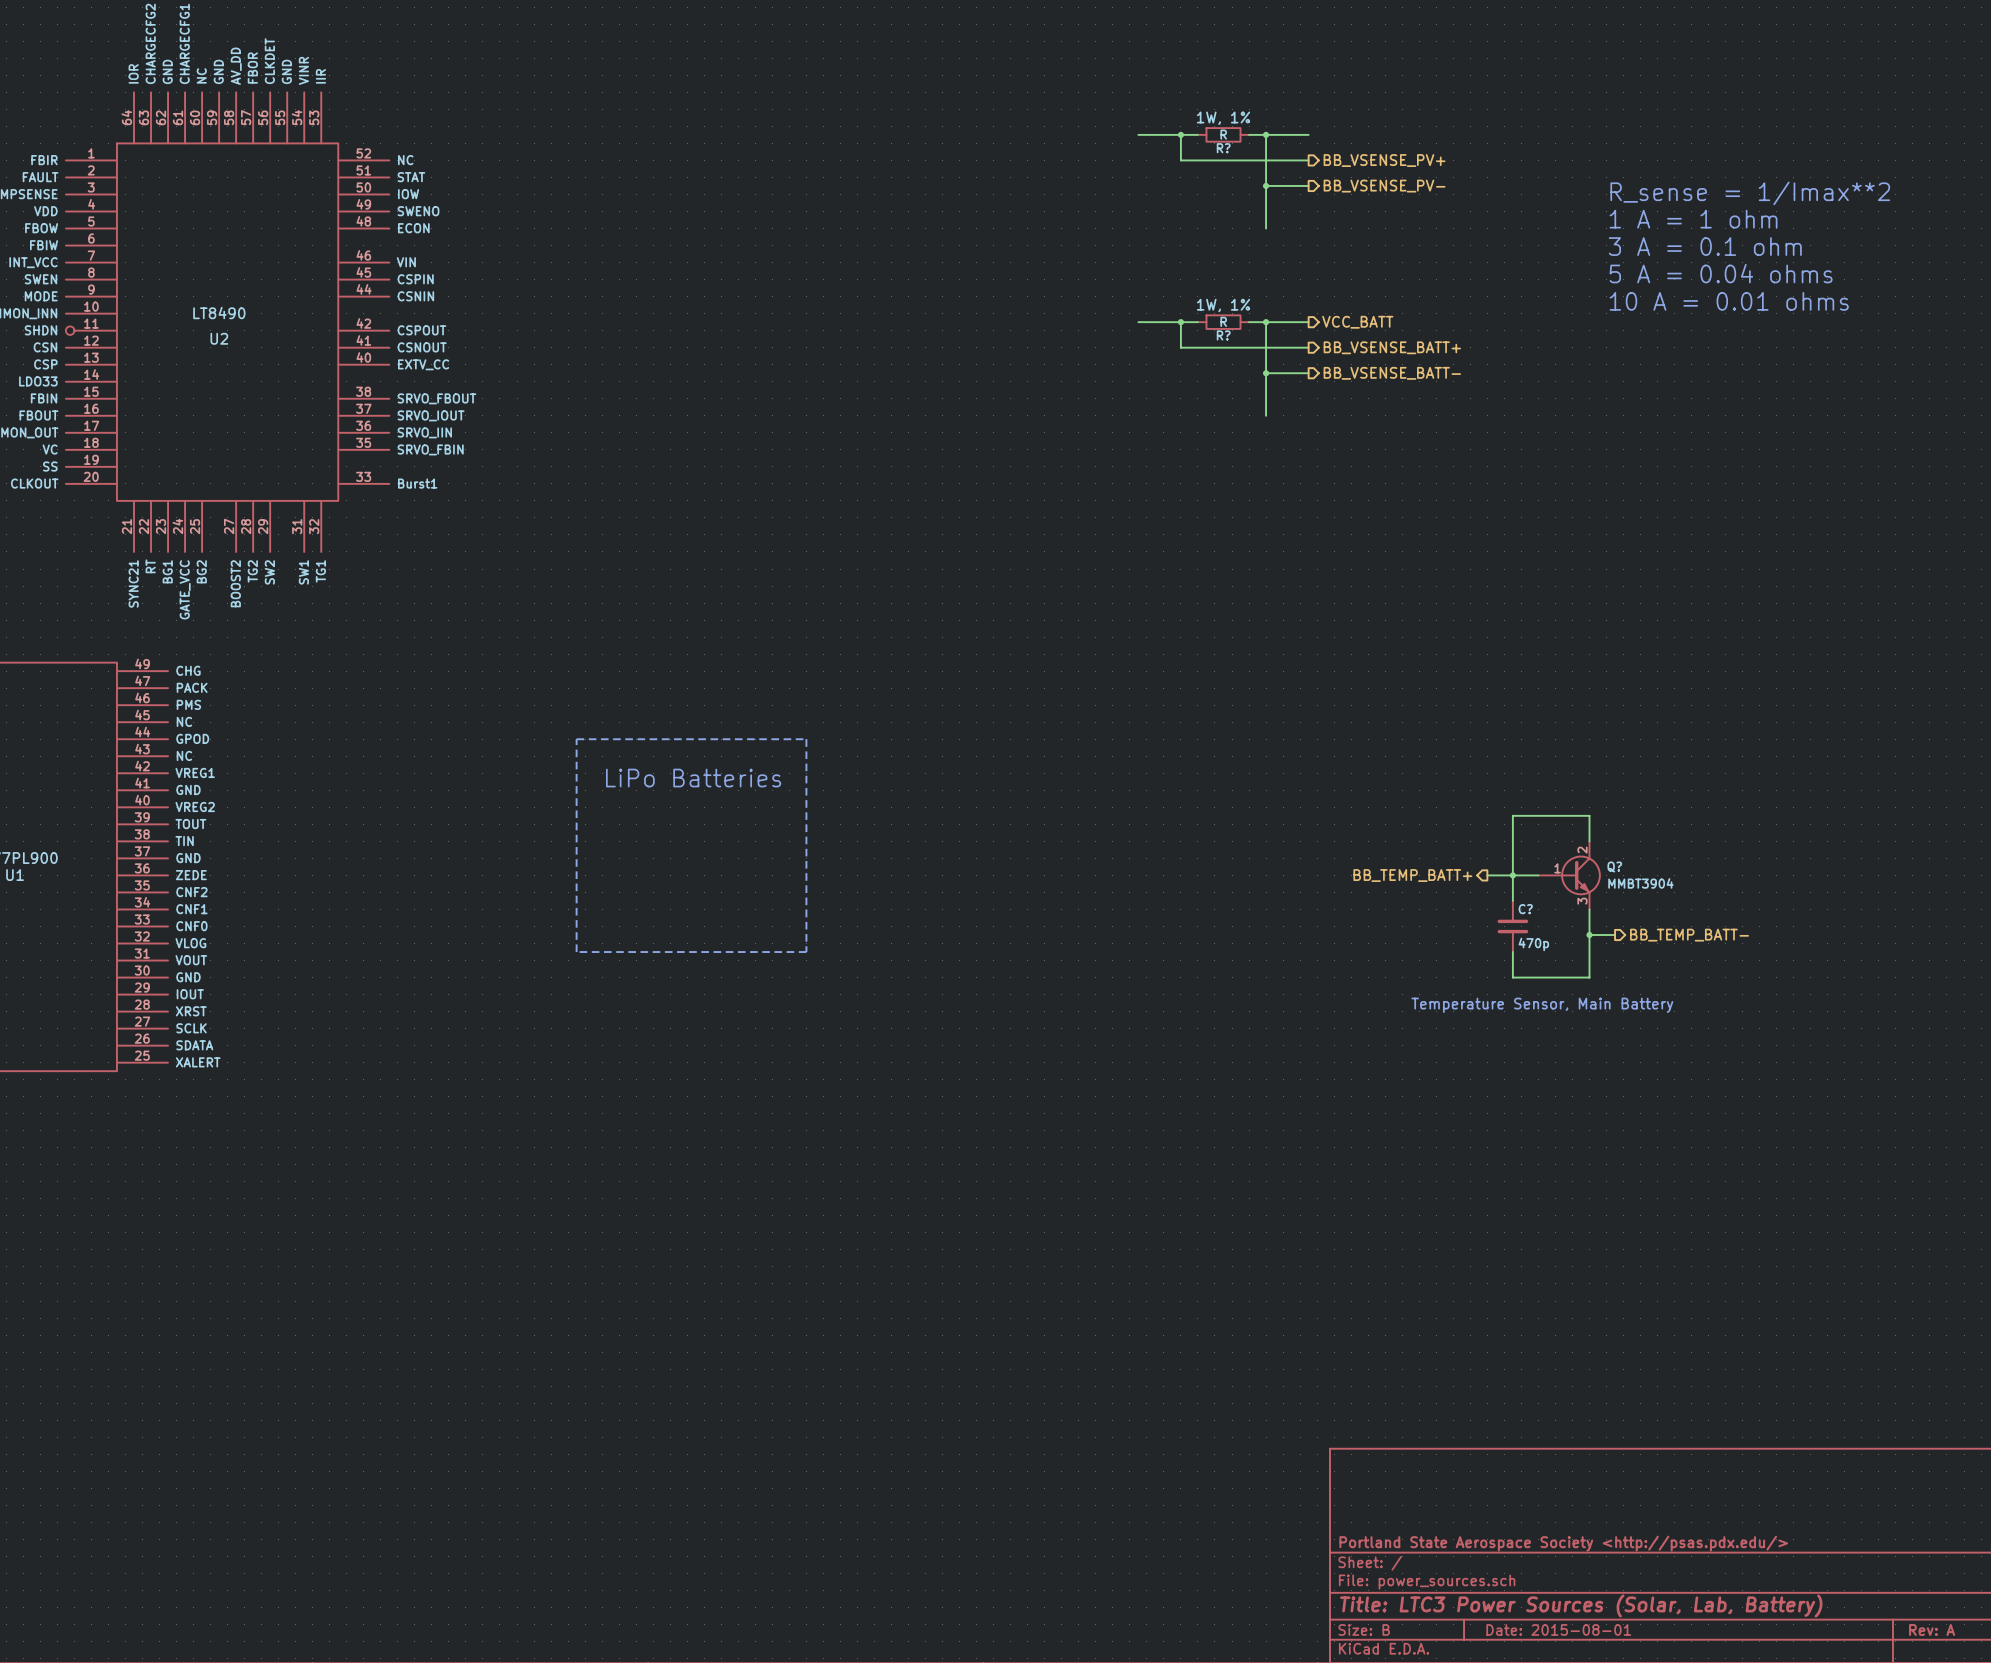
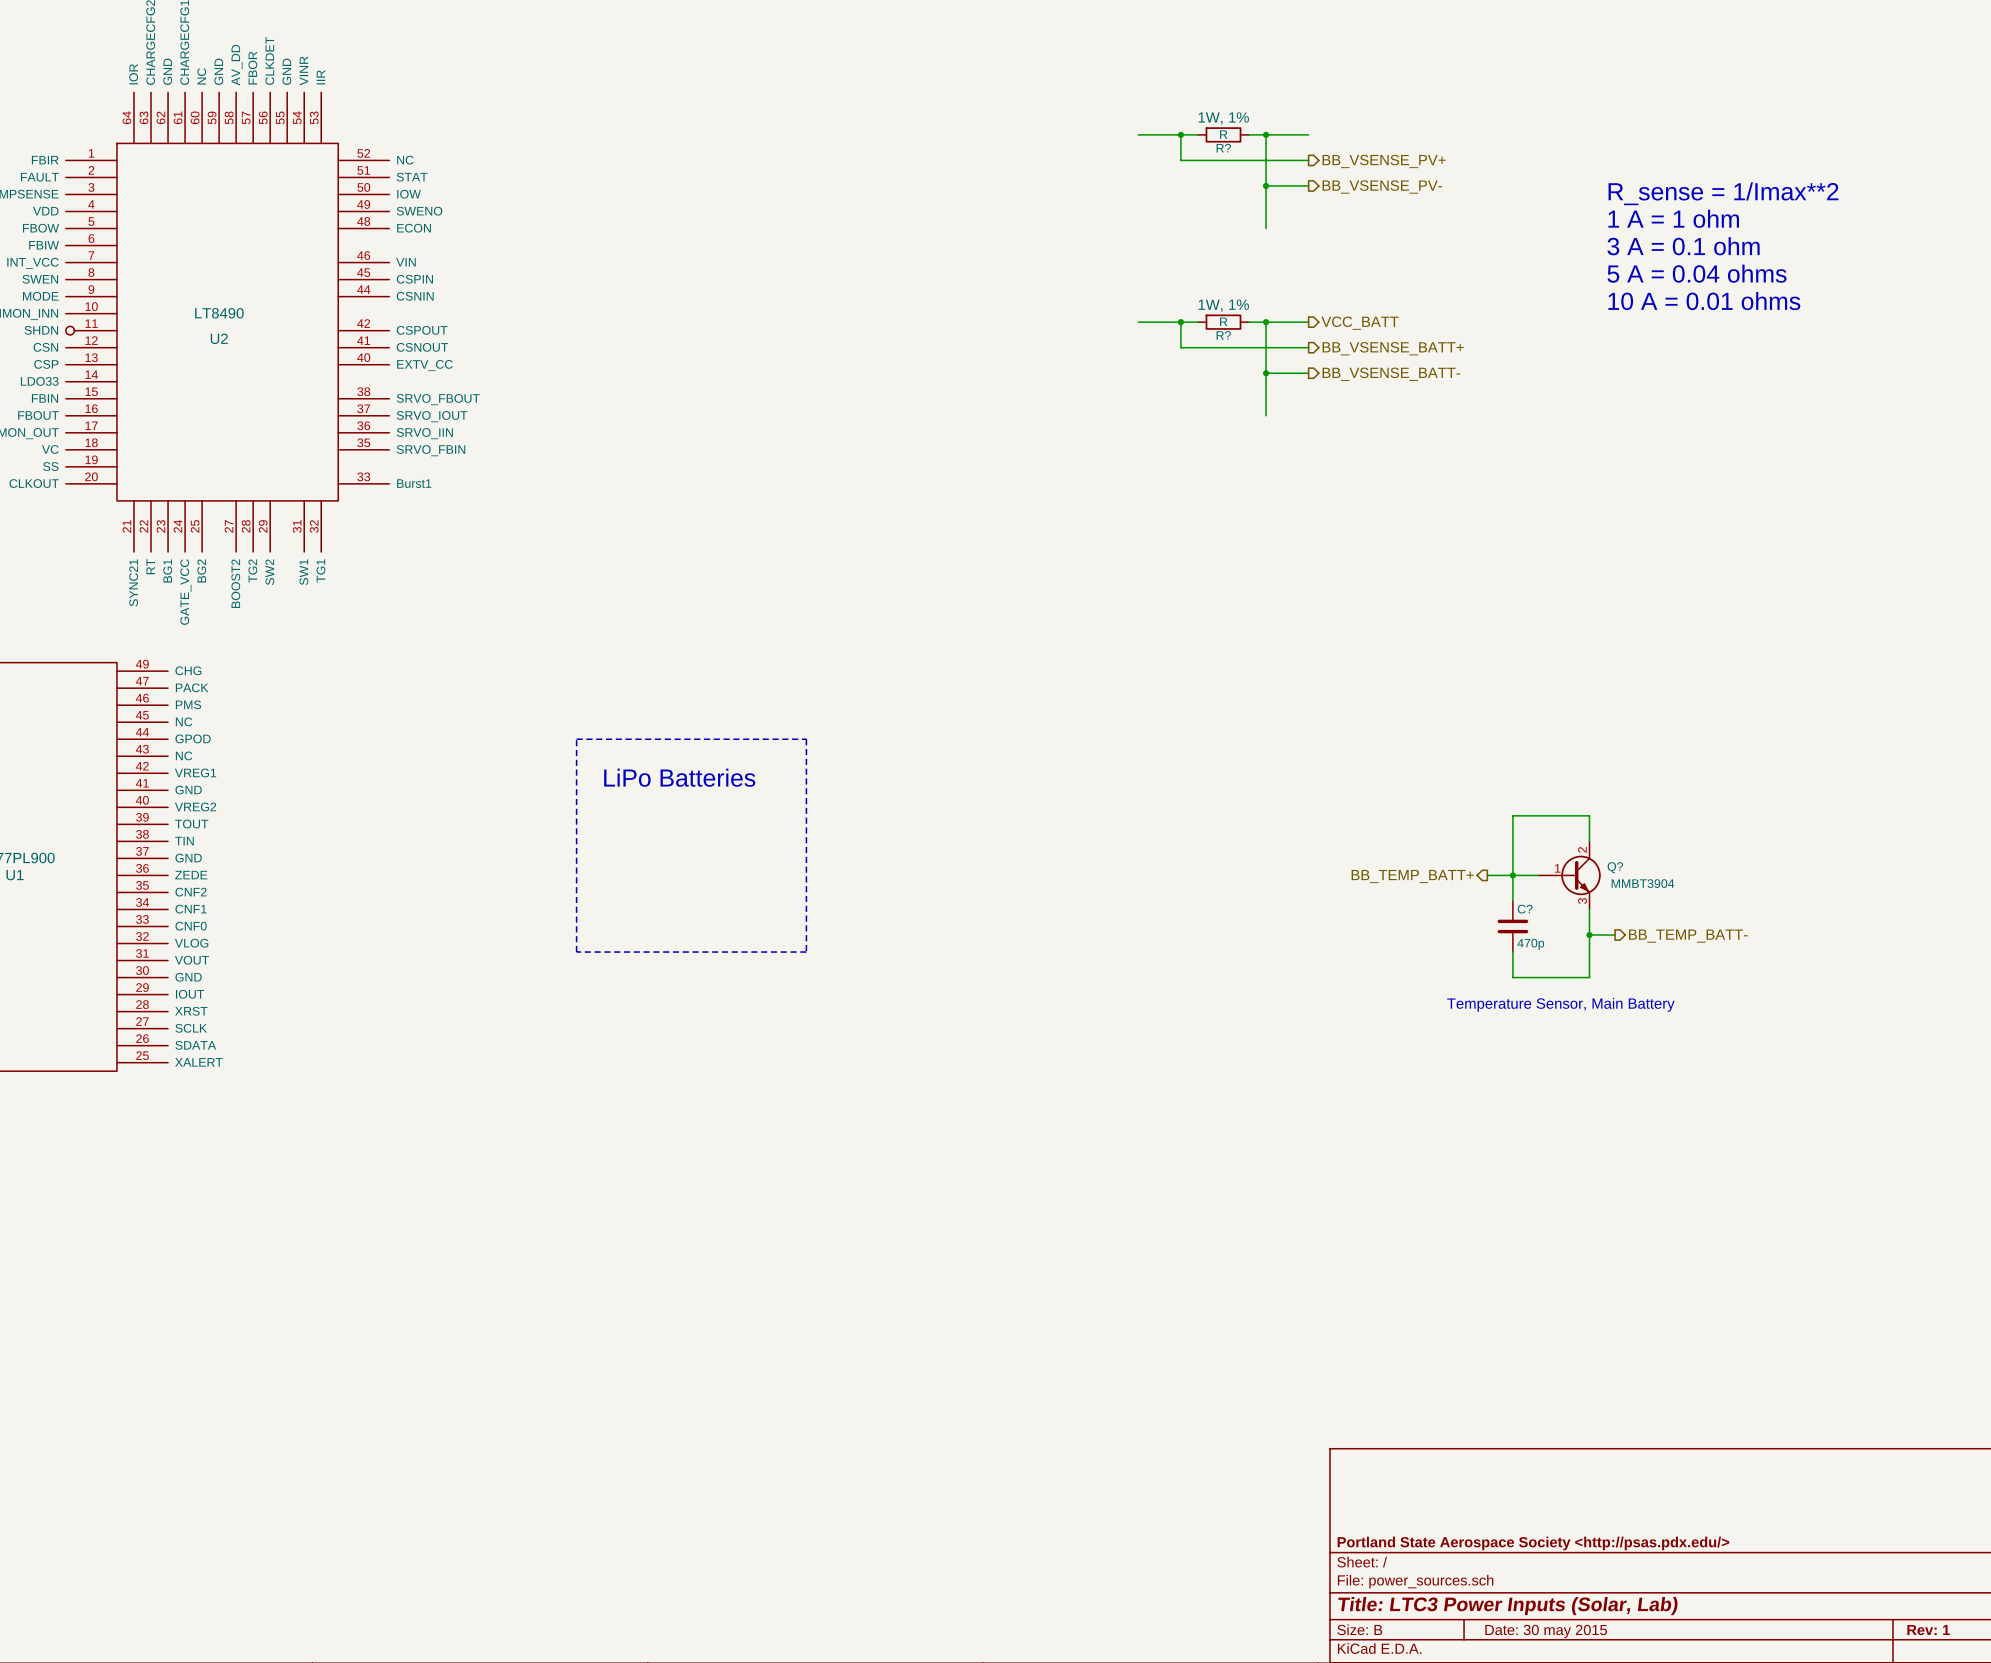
title block: Title: LTC3 Power Sources (Solar, Lab, Battery) (1581, 1605) -> Title: LTC3 Power Inputs (Solar, Lab) (1507, 1606)
title block: Date: 2015-08-01 (1558, 1629) -> Date: 30 may 2015 (1546, 1631)
title block: Rev: A (1932, 1629) -> Rev: 1 (1928, 1630)

